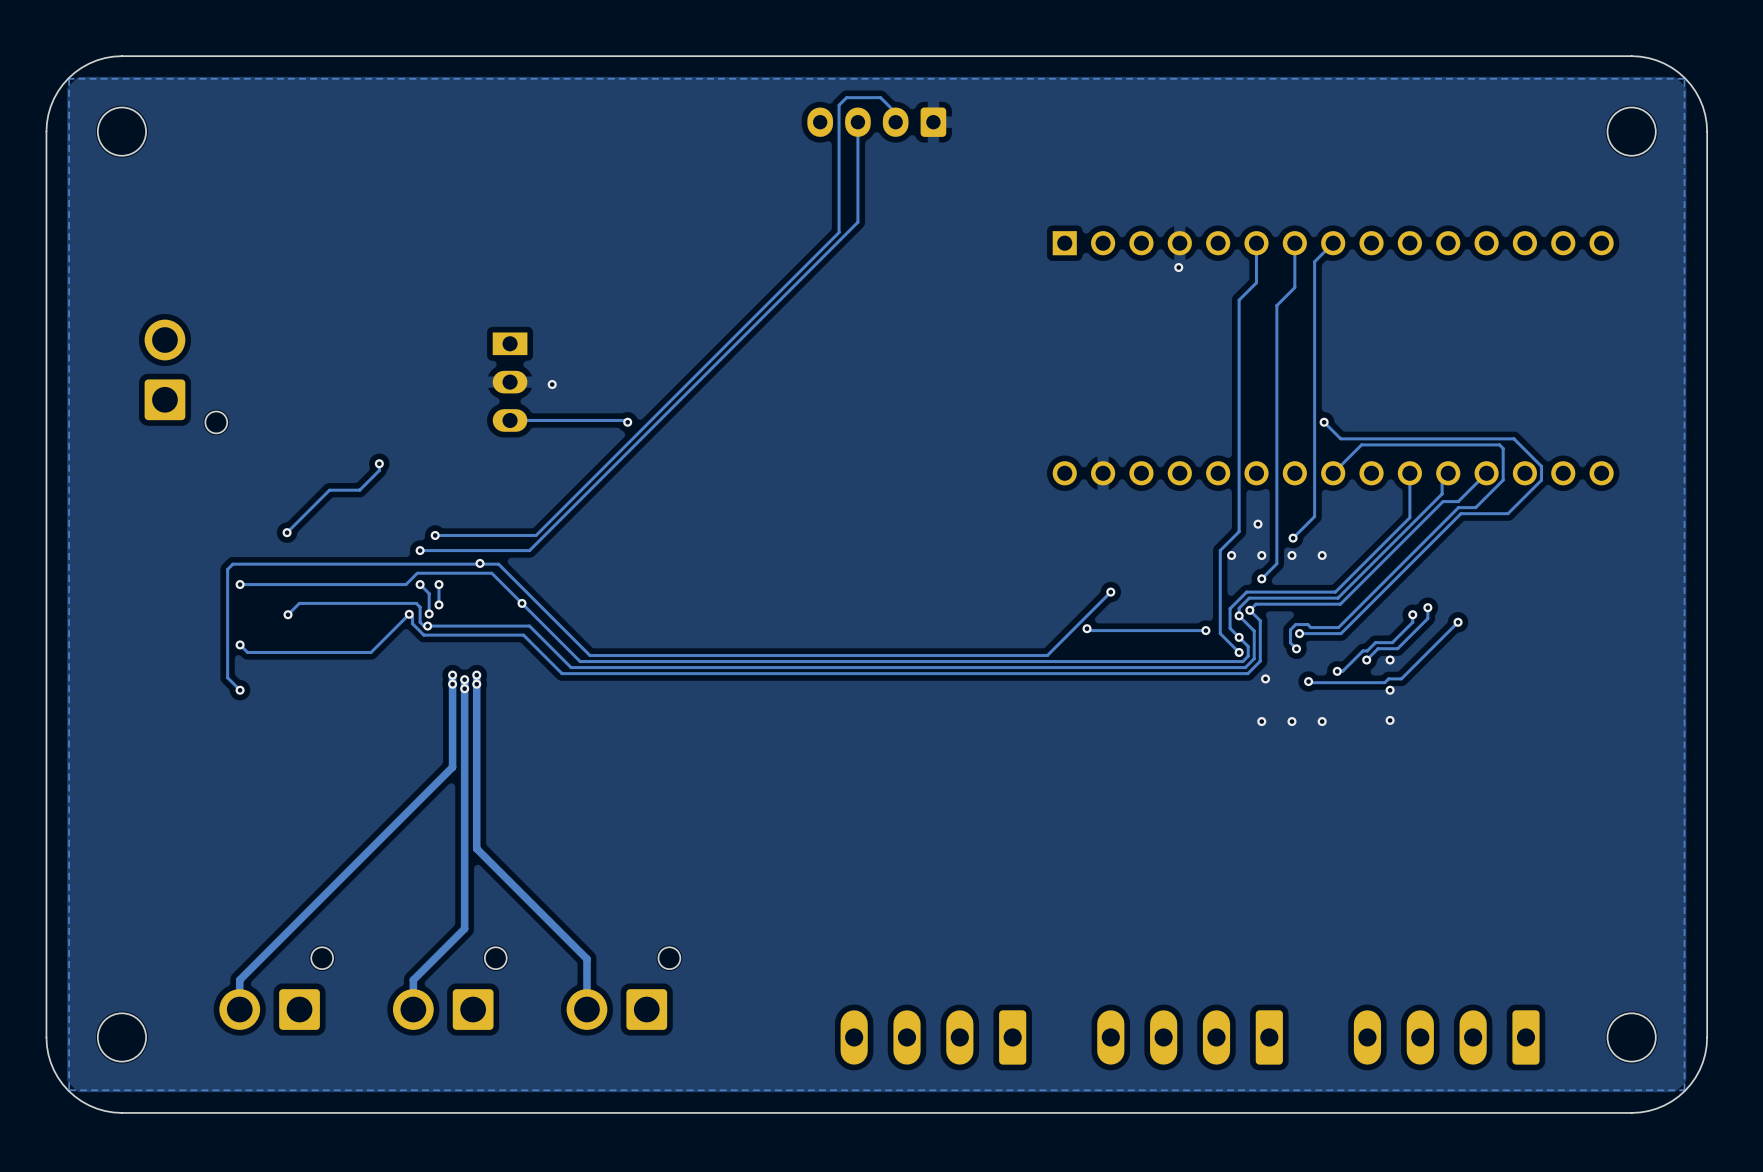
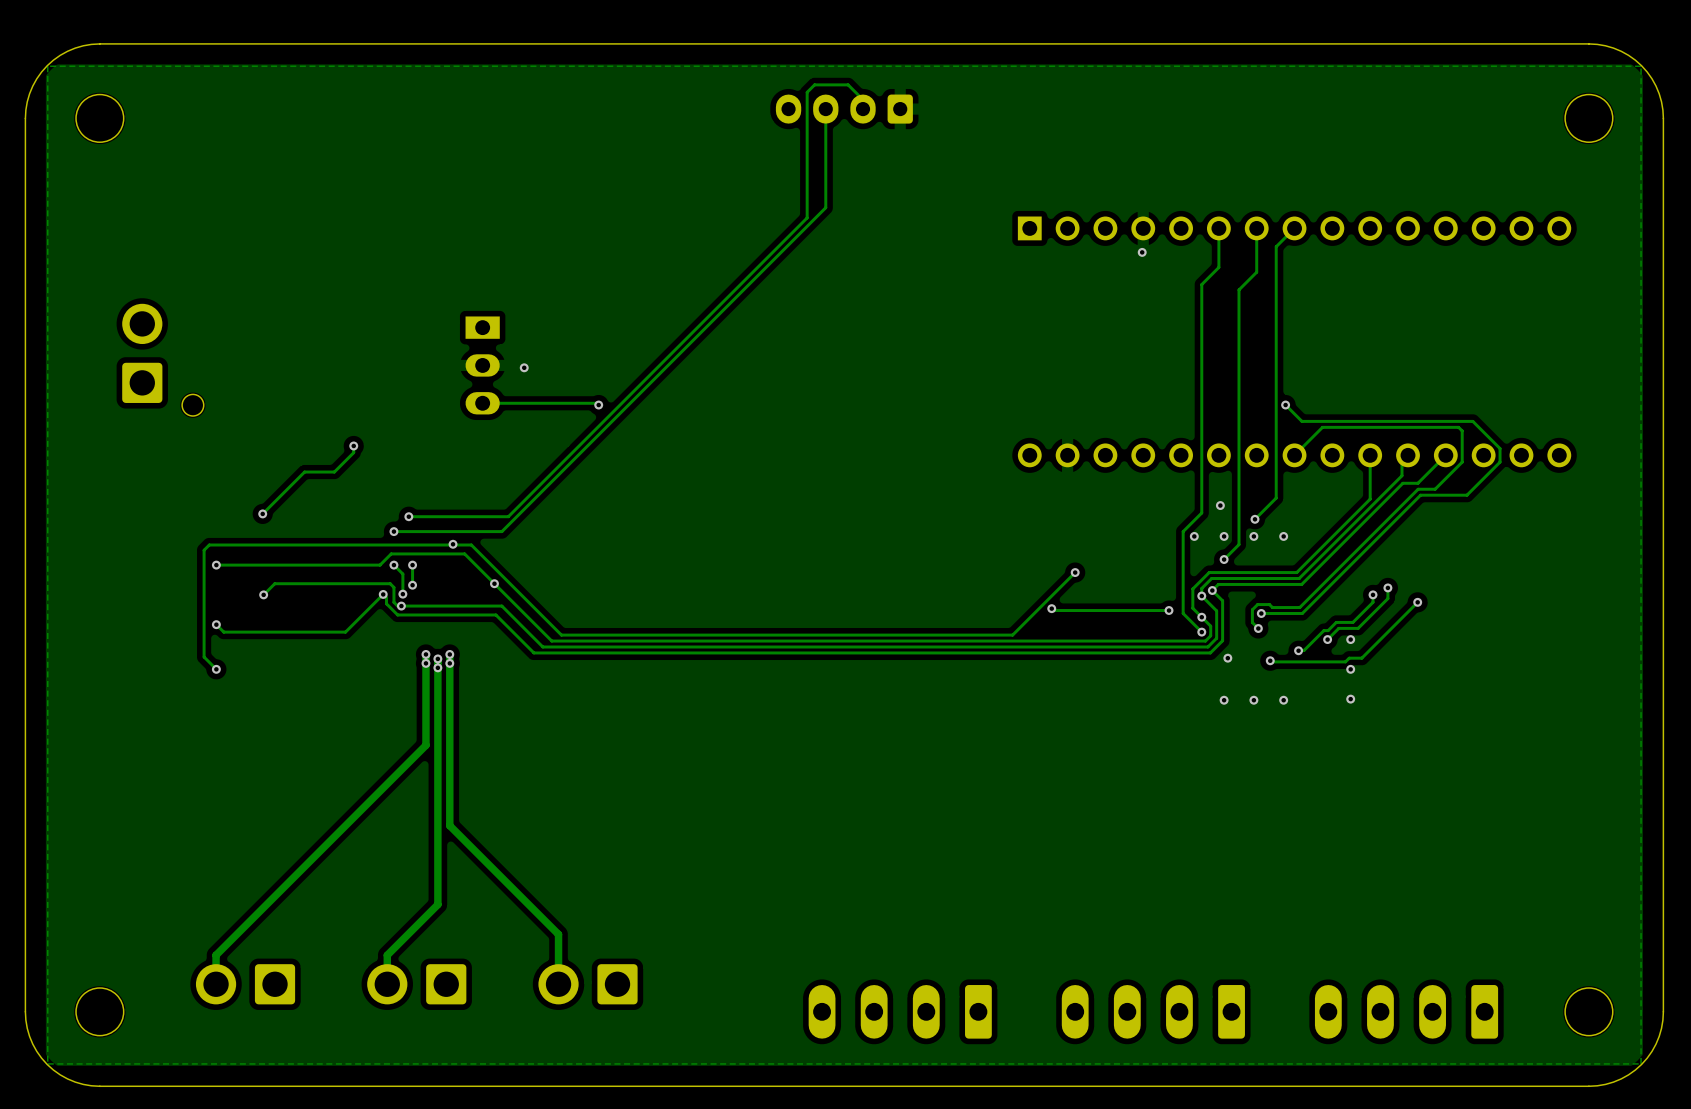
part: (276, 988) -> none
part: (449, 988) -> none
part: (623, 988) -> none

